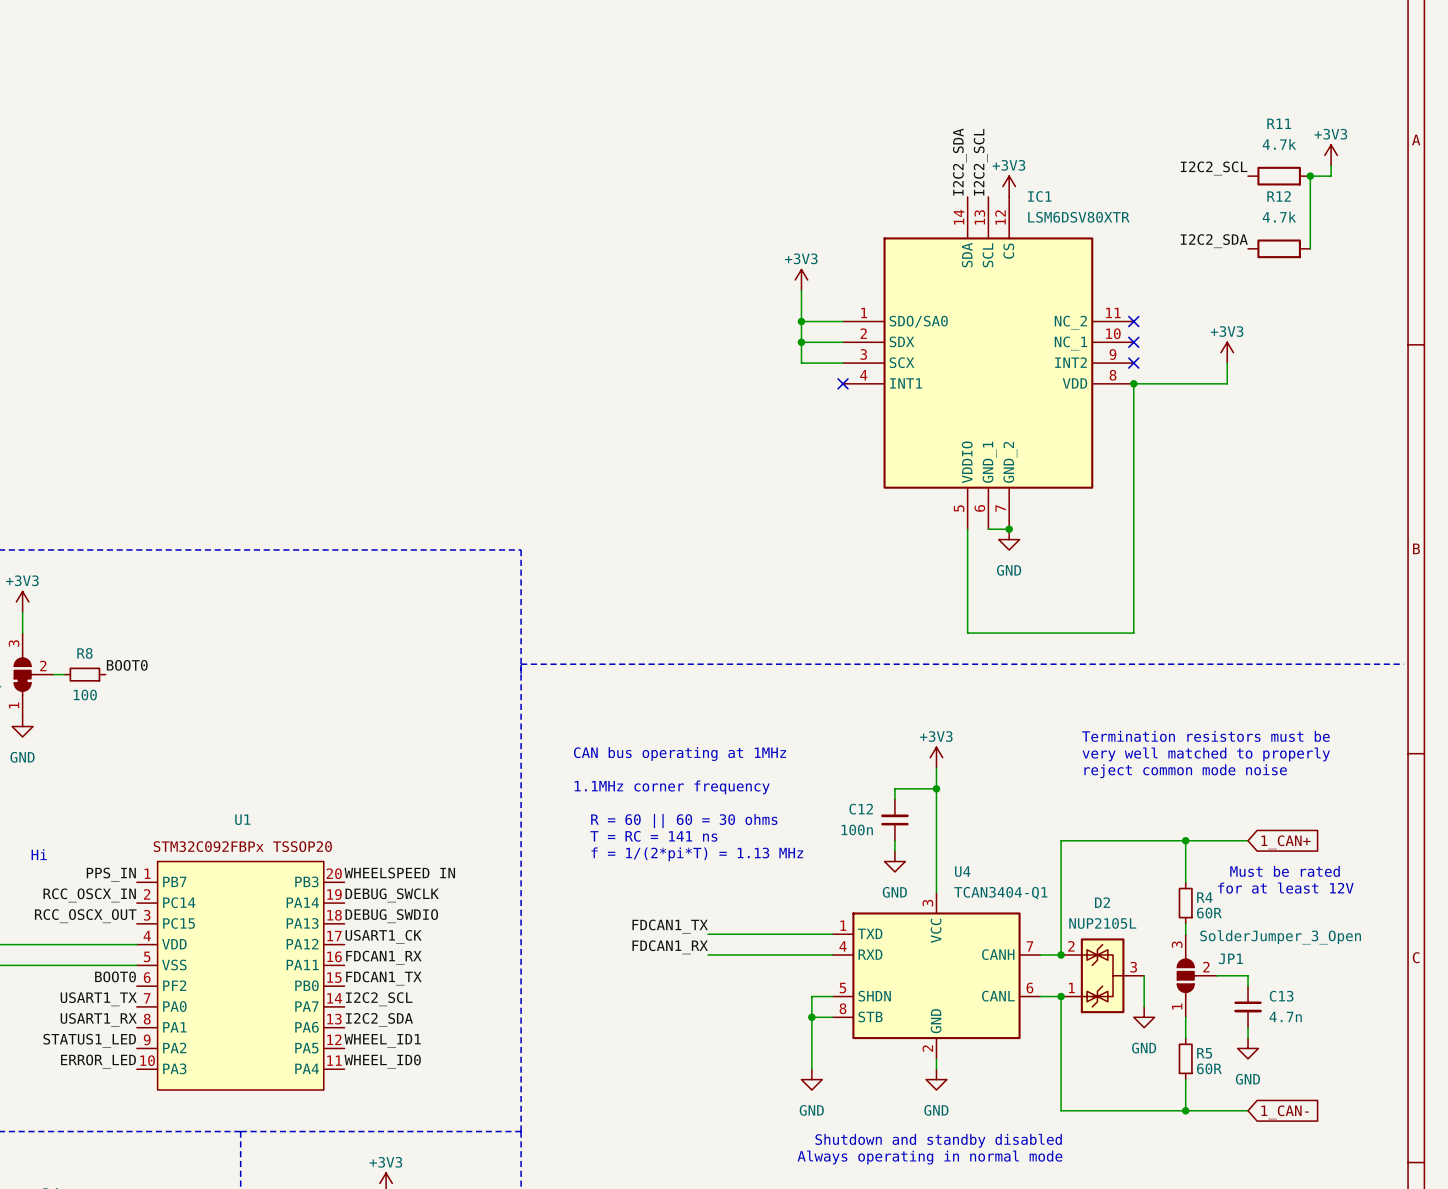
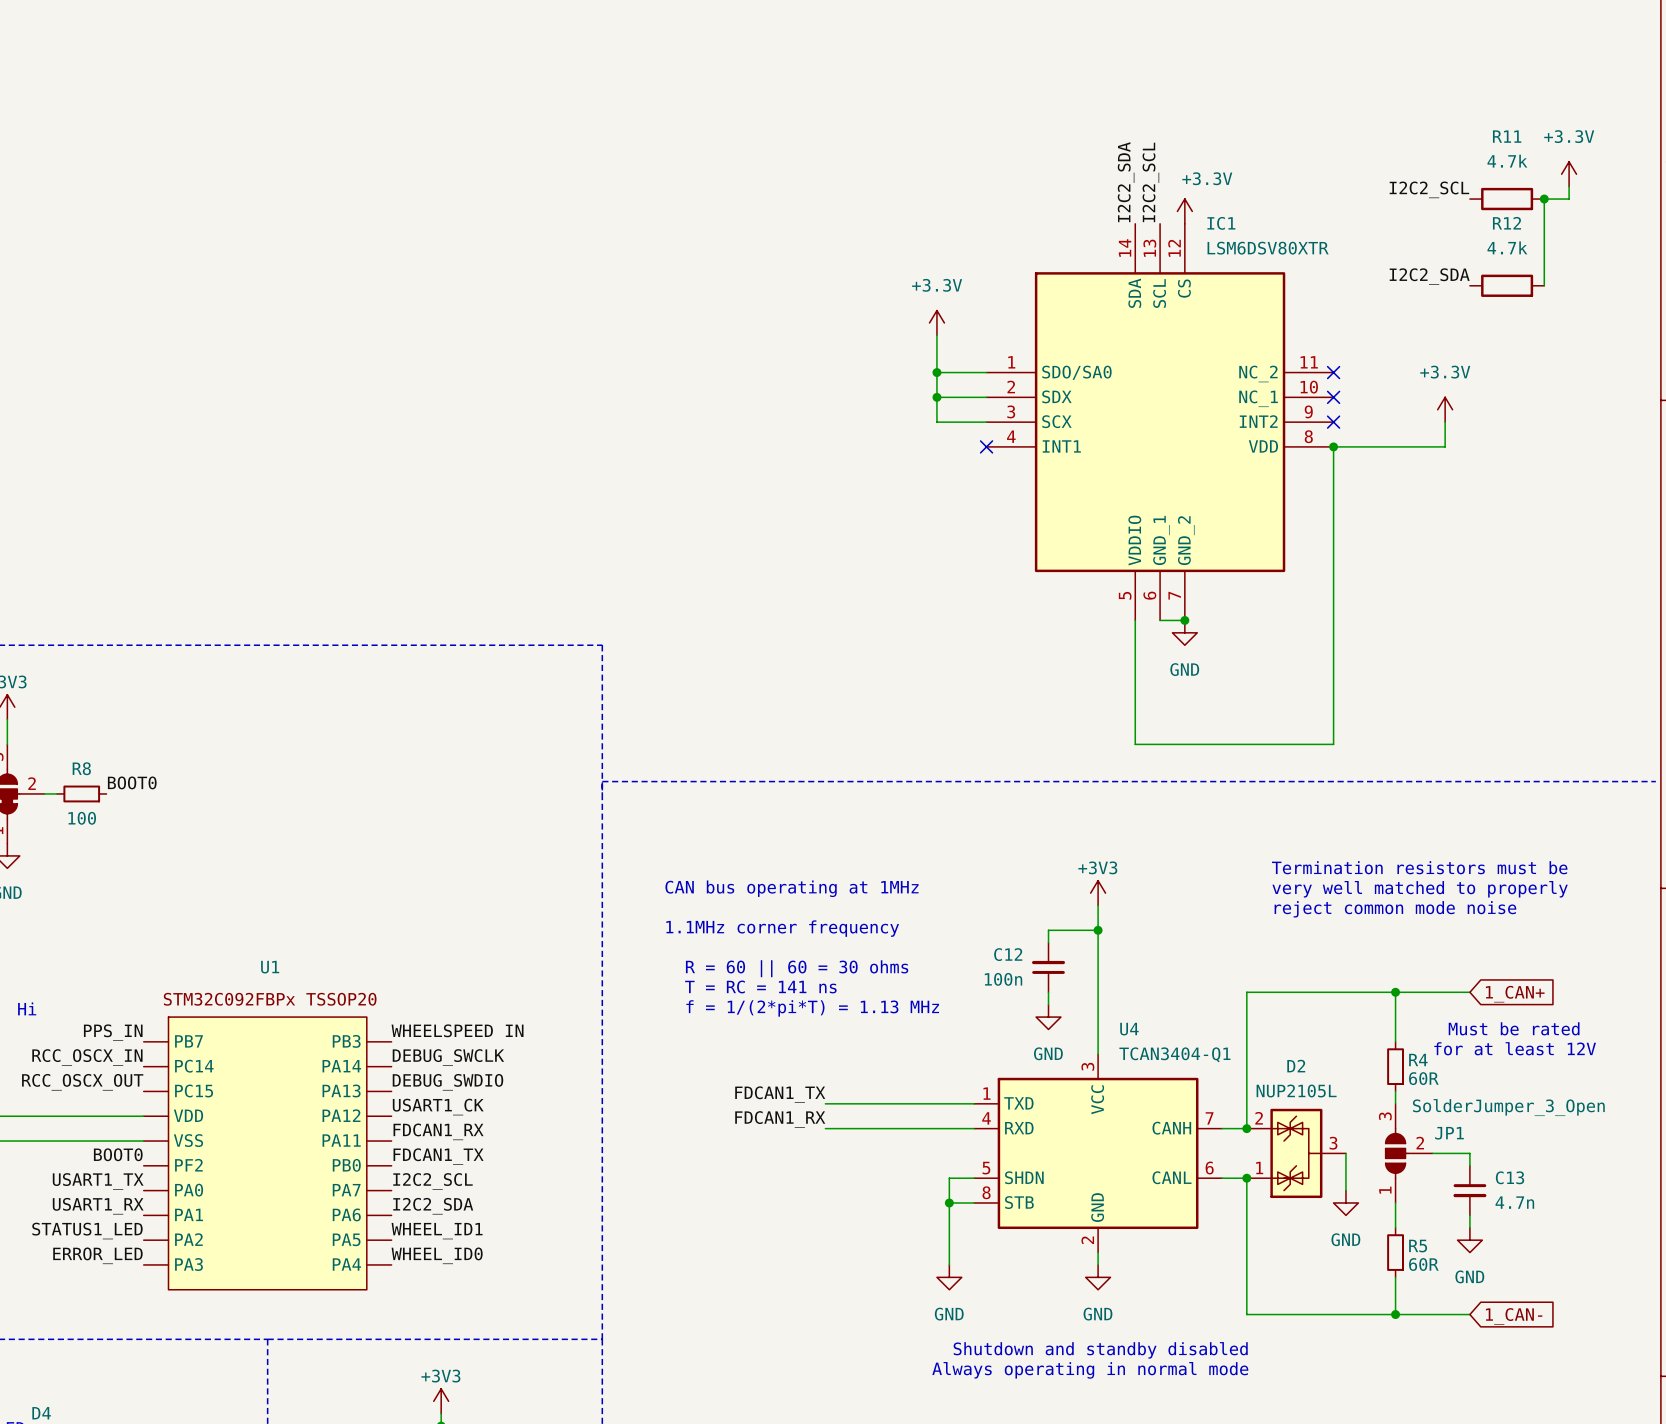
power symbol: +3V3 (1331, 155) -> +3.3V (1569, 174)
power symbol: +3V3 (1009, 186) -> +3.3V (1184, 211)
power symbol: +3V3 (801, 279) -> +3.3V (936, 322)
power symbol: +3V3 (1227, 352) -> +3.3V (1445, 409)
U1 symbol: [136, 861, 345, 1091] -> [143, 1017, 392, 1290]

